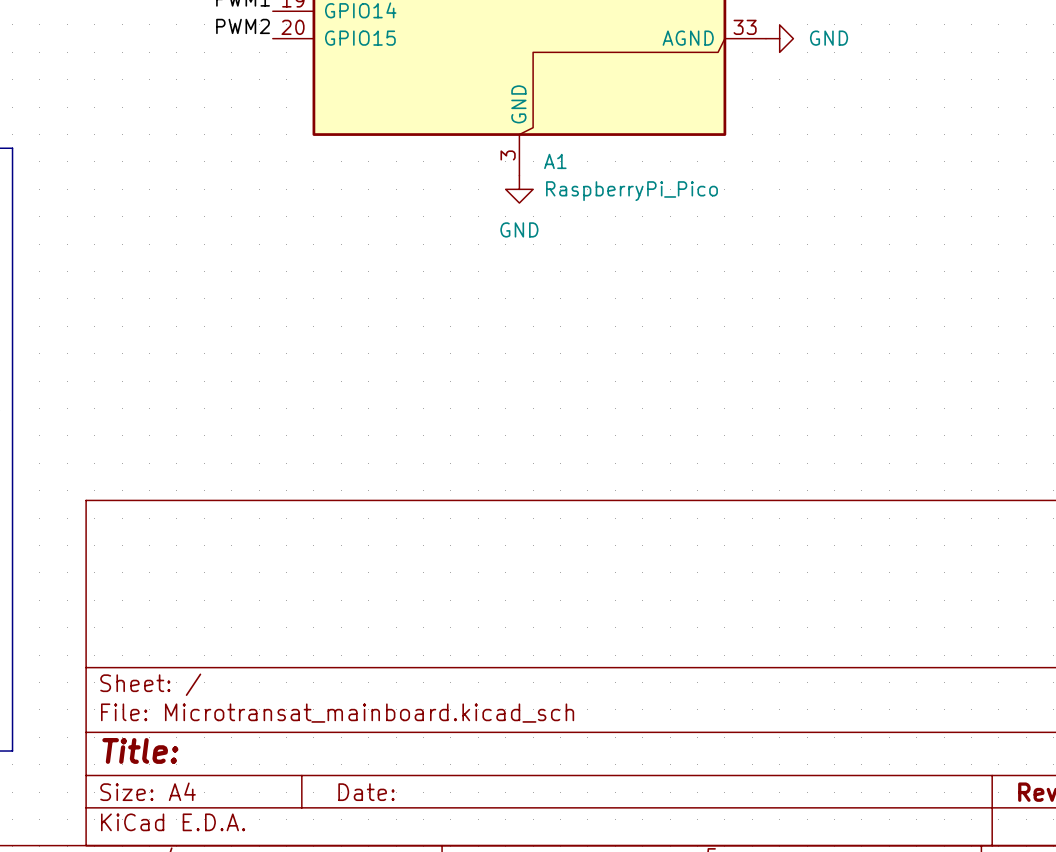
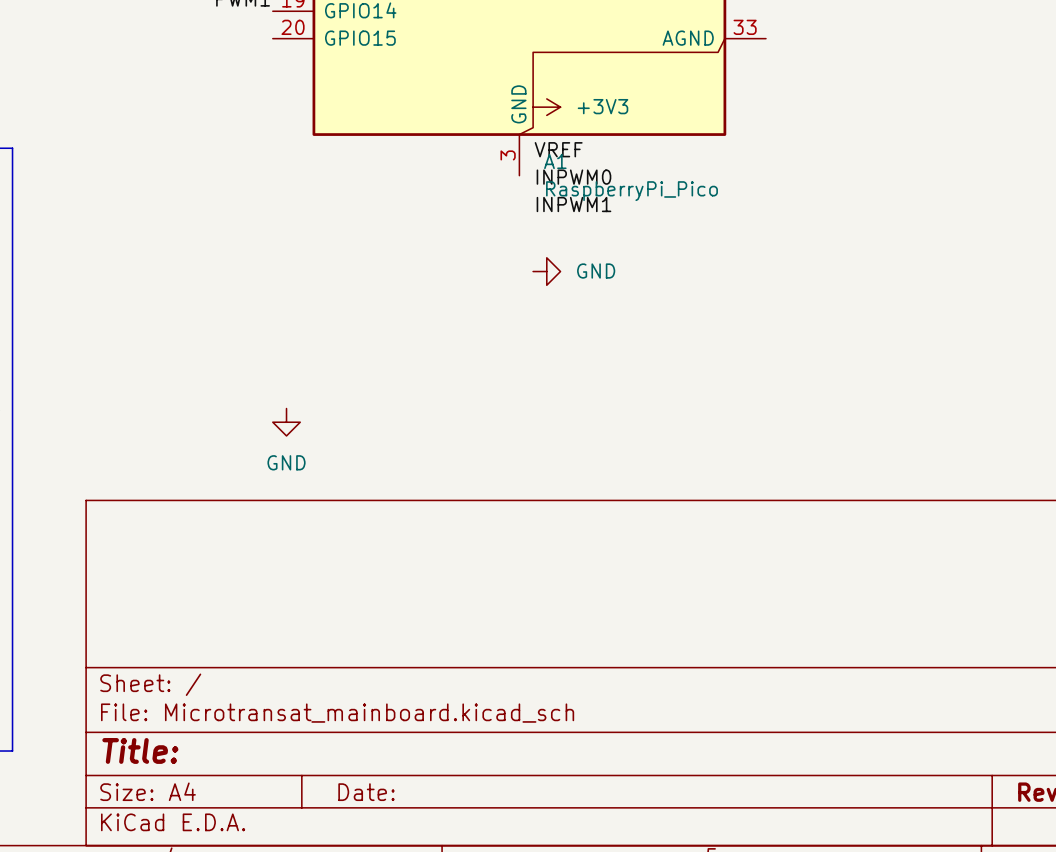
label: PWM2 (243, 26) -> none
power symbol: GND (779, 38) -> none
power symbol: none -> +3V3 (546, 107)
label: none -> VREF (558, 149)
label: none -> INPWM0 (573, 177)
power symbol rotation: 0° (519, 189) -> 90° counterclockwise (546, 271)
power symbol position: GND (519, 189) -> GND (546, 271)
label: none -> INPWM1 (573, 204)
power symbol: none -> GND (286, 422)

